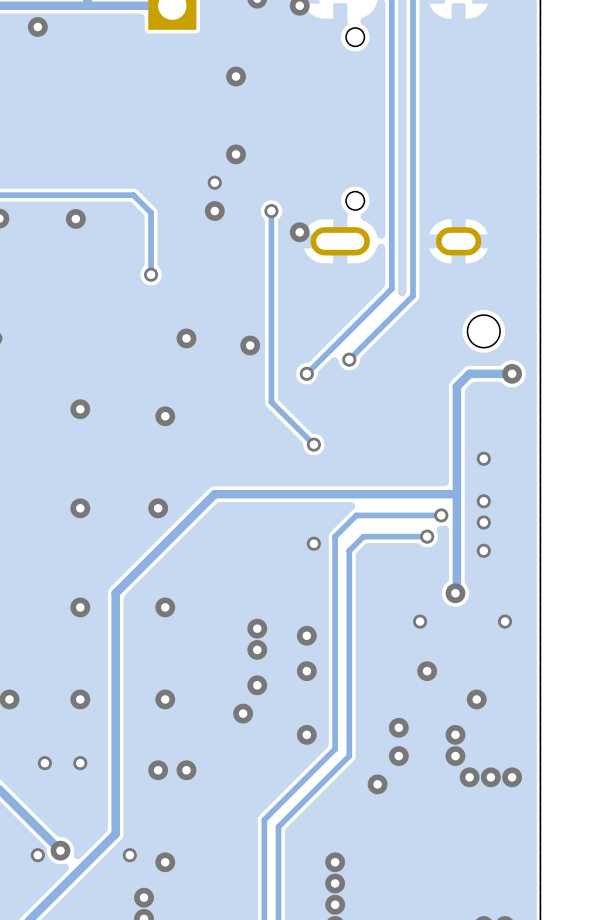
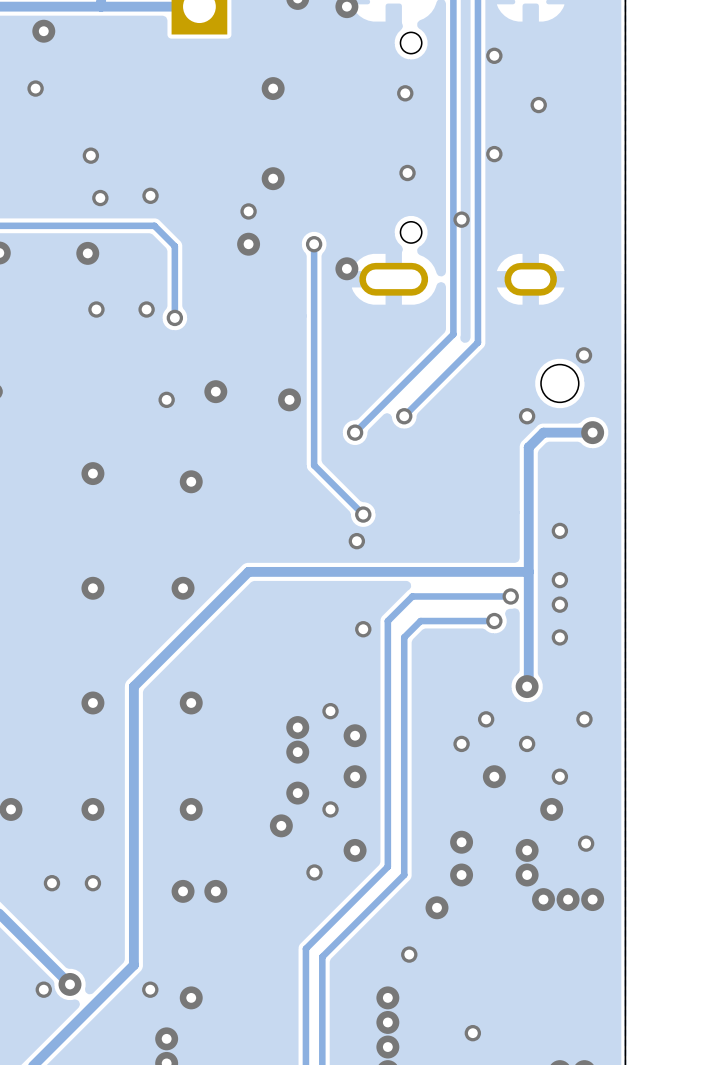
via: none -> (494, 55)
via: none -> (35, 88)
via: none -> (405, 93)
via: none -> (538, 105)
via: none -> (494, 154)
via: none -> (90, 155)
via: none -> (407, 173)
via: none -> (150, 195)
via: none -> (100, 198)
via: none -> (461, 219)
via: none -> (96, 309)
via: none -> (146, 309)
via: none -> (583, 355)
via: none -> (166, 399)
via: none -> (527, 416)
via: none -> (356, 541)
via: none -> (330, 711)
via: none -> (461, 743)
via: none -> (527, 743)
via: none -> (559, 776)
via: none -> (330, 809)
via: none -> (586, 843)
via: none -> (314, 872)
via: none -> (409, 954)
via: none -> (472, 1033)

